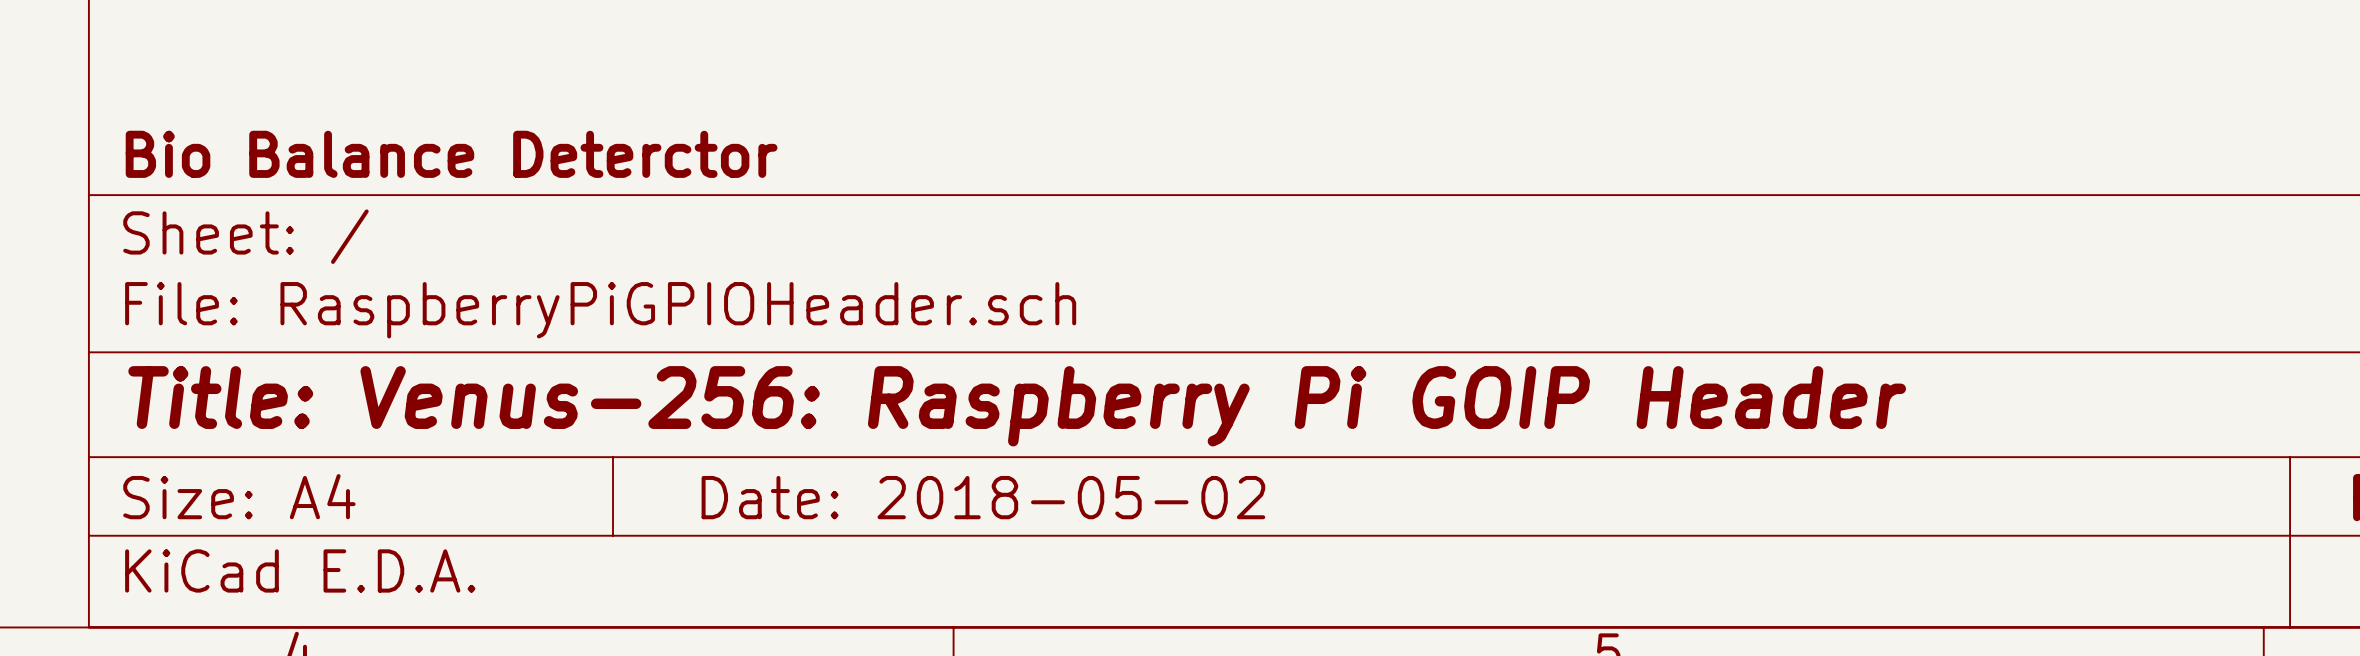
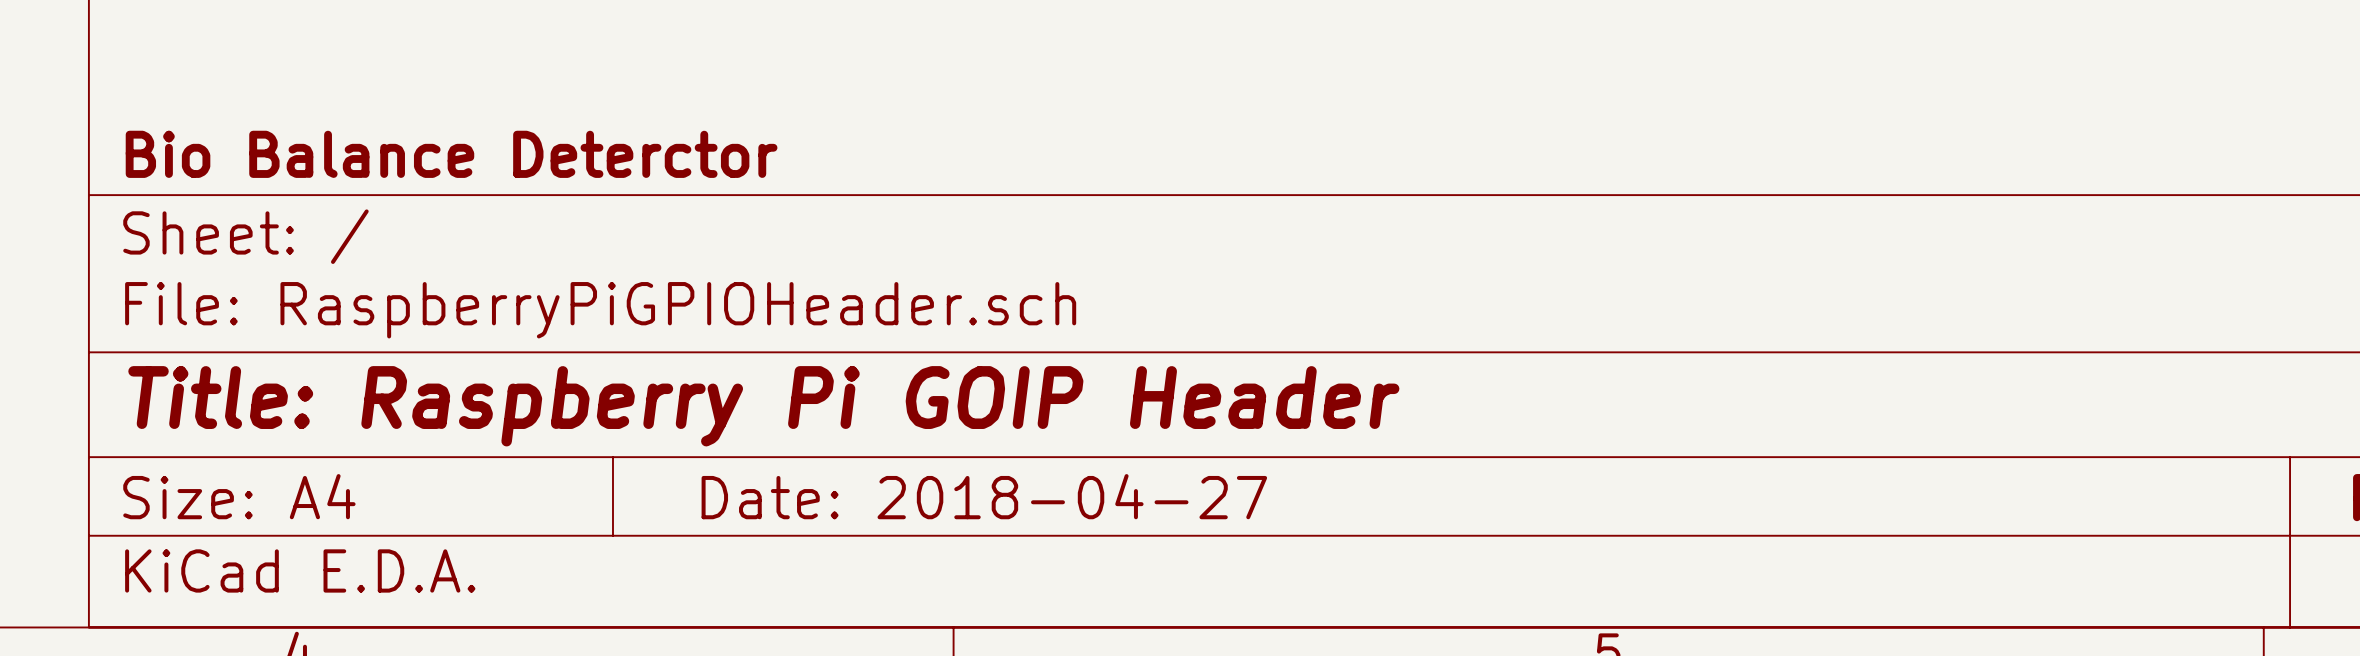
title block: Title: Venus-256: Raspberry Pi GOIP Header (1017, 406) -> Title: Raspberry Pi GOIP Header (763, 406)
title block: Date: 2018-05-02 (983, 497) -> Date: 2018-04-27 (984, 496)

